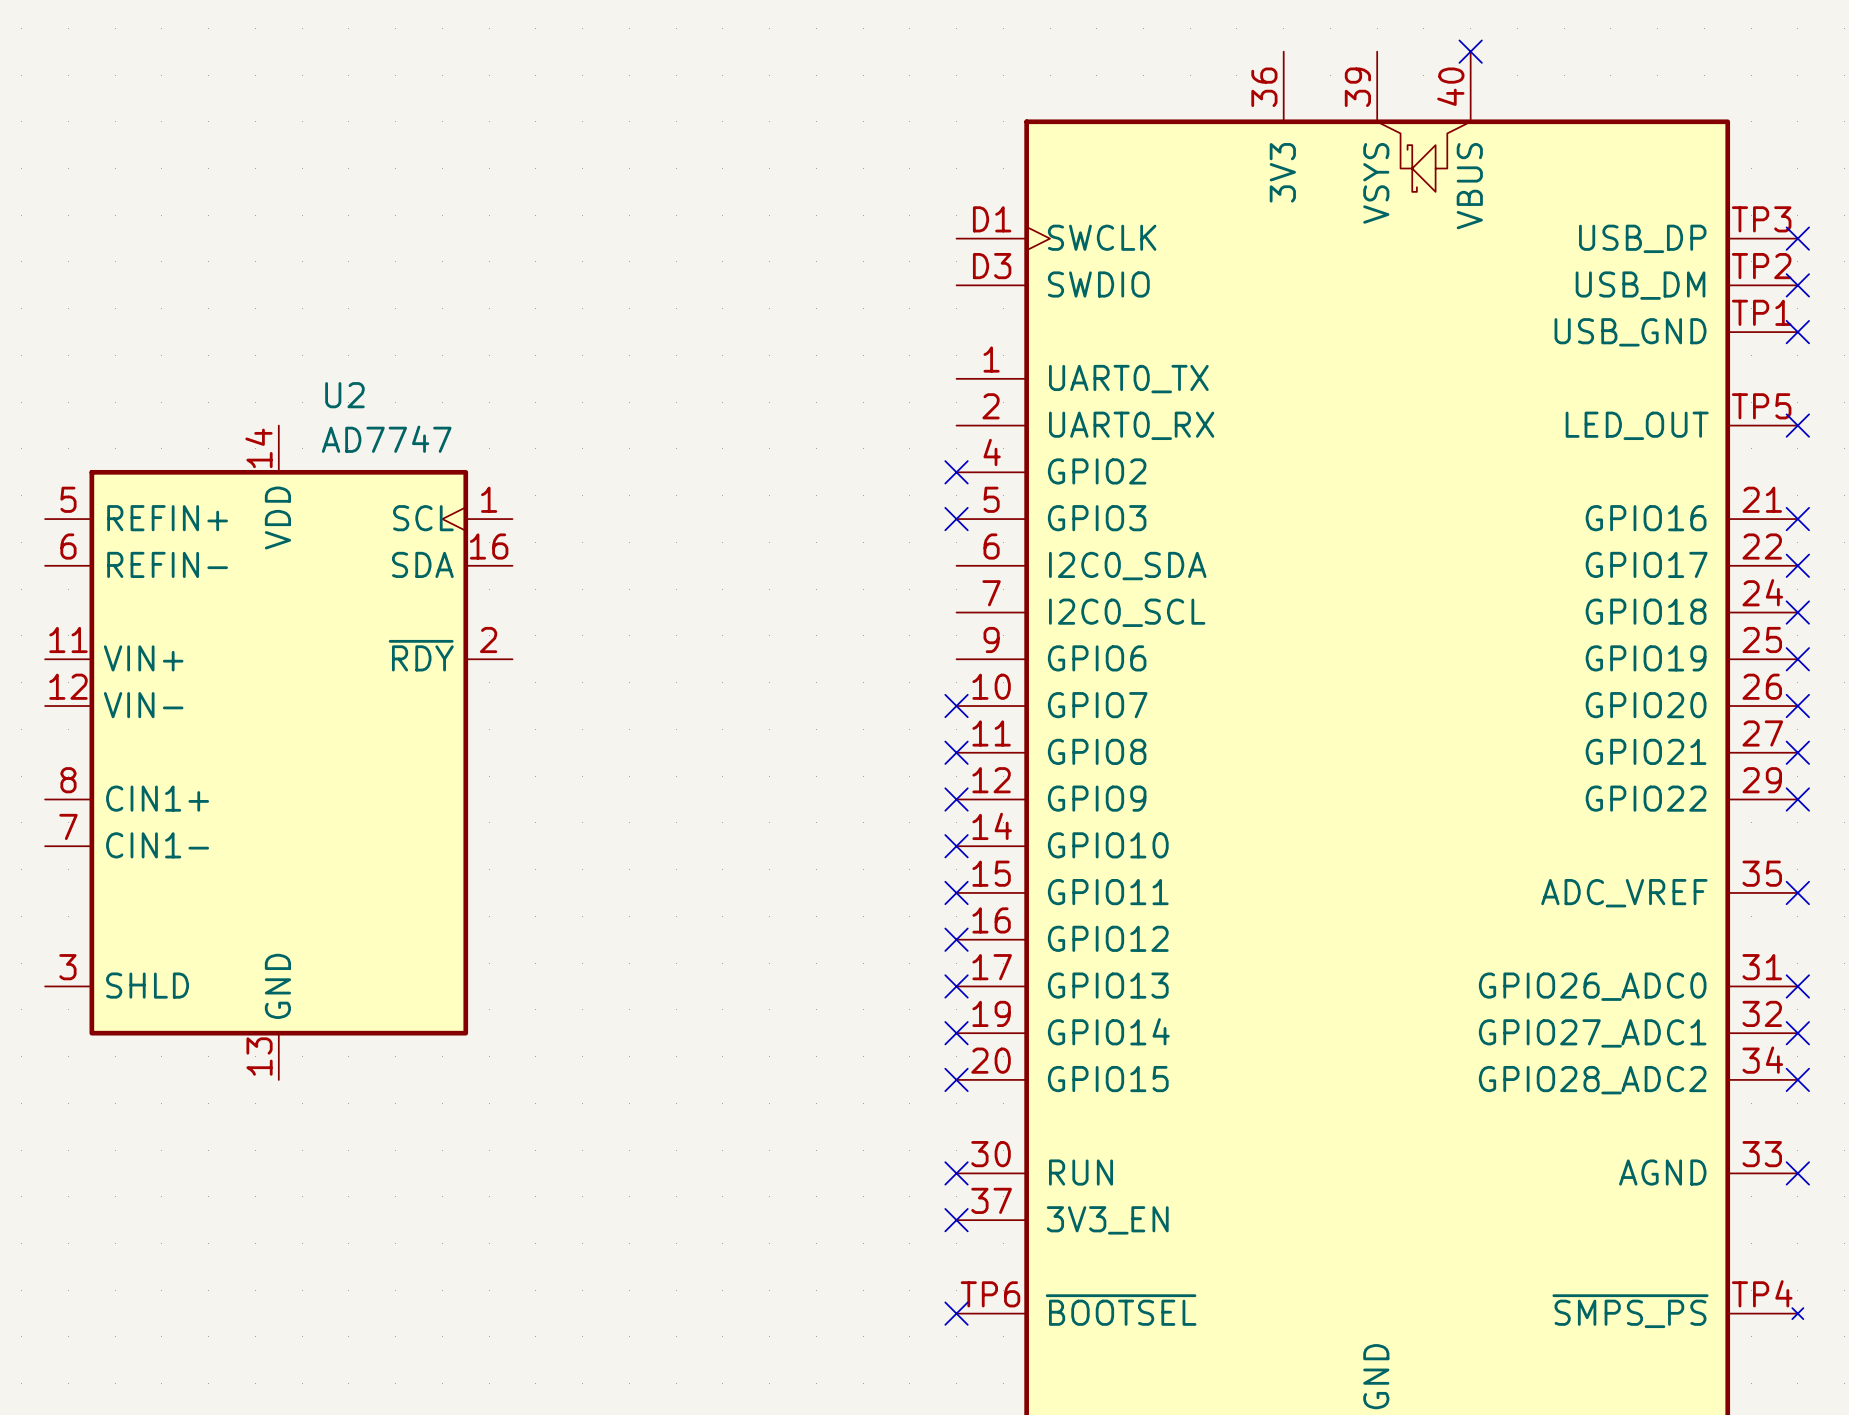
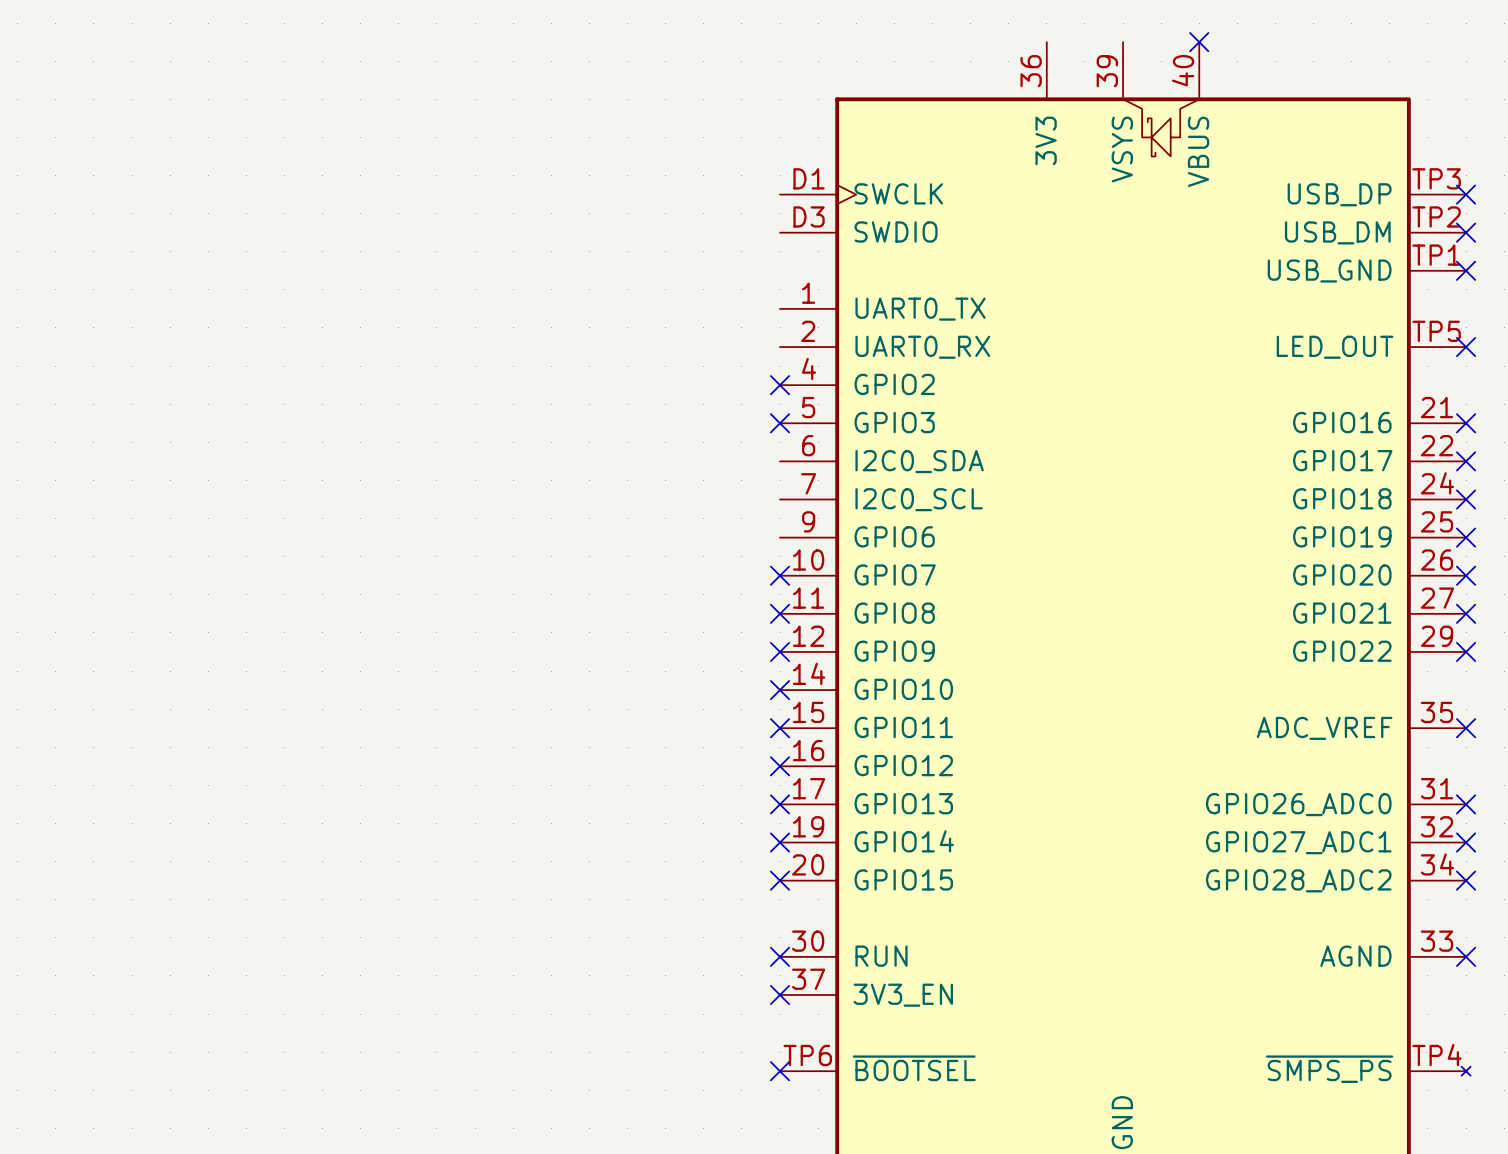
U2: AD7747 (278, 752) -> none

